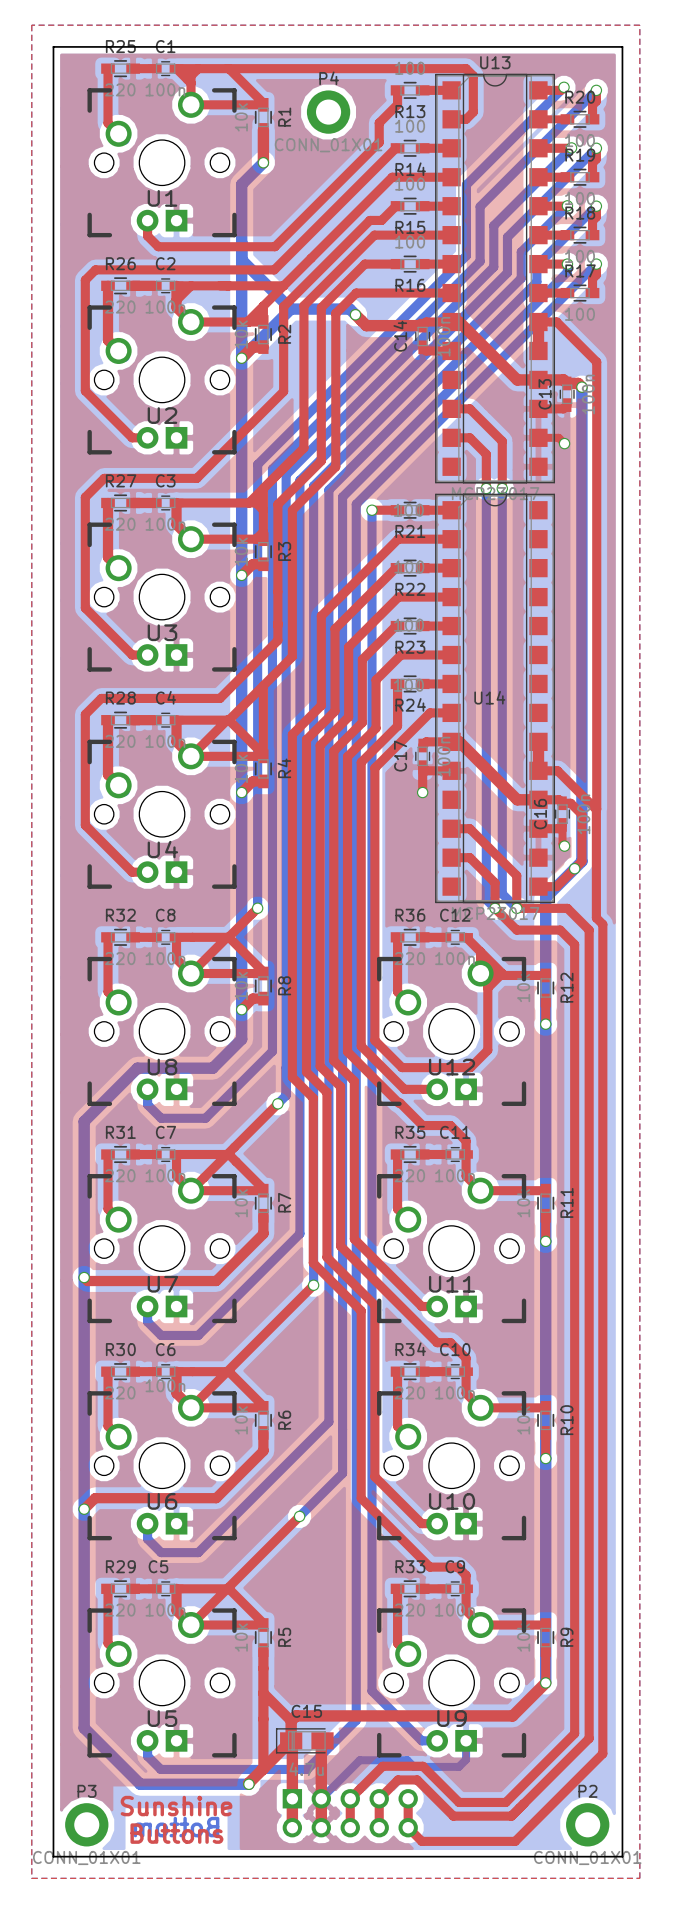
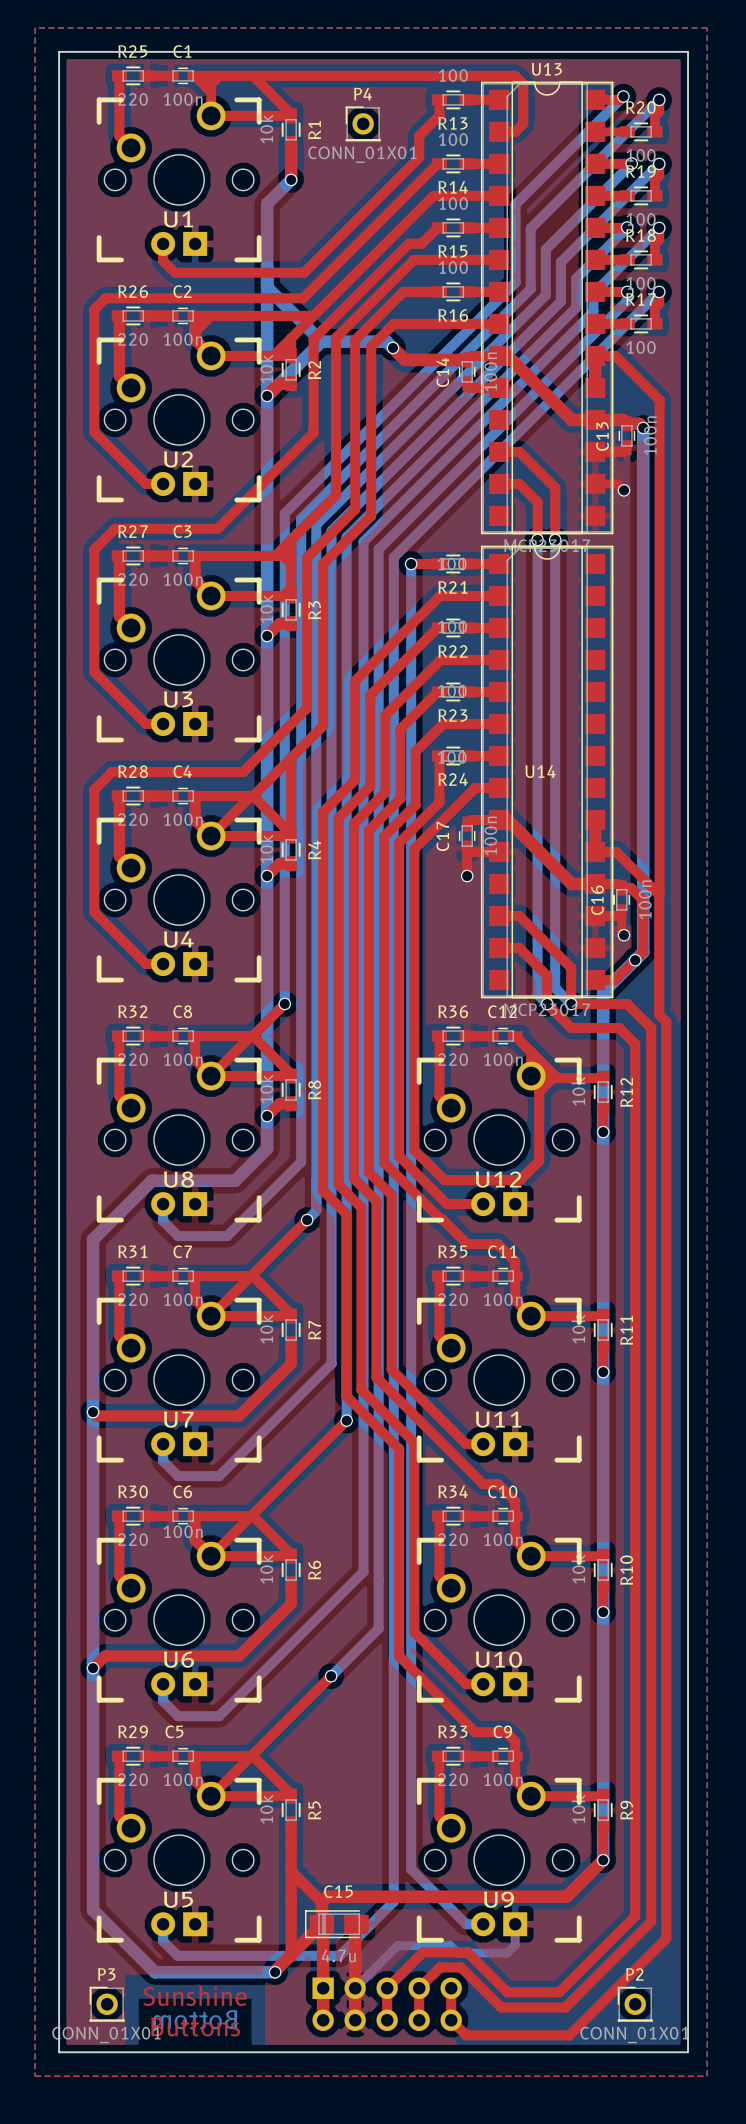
P4 footprint: [306, 90, 351, 134] -> [345, 106, 381, 142]
P3 footprint: [65, 1803, 109, 1847] -> [89, 1986, 125, 2022]
P2 footprint: [566, 1803, 610, 1847] -> [617, 1986, 653, 2022]

